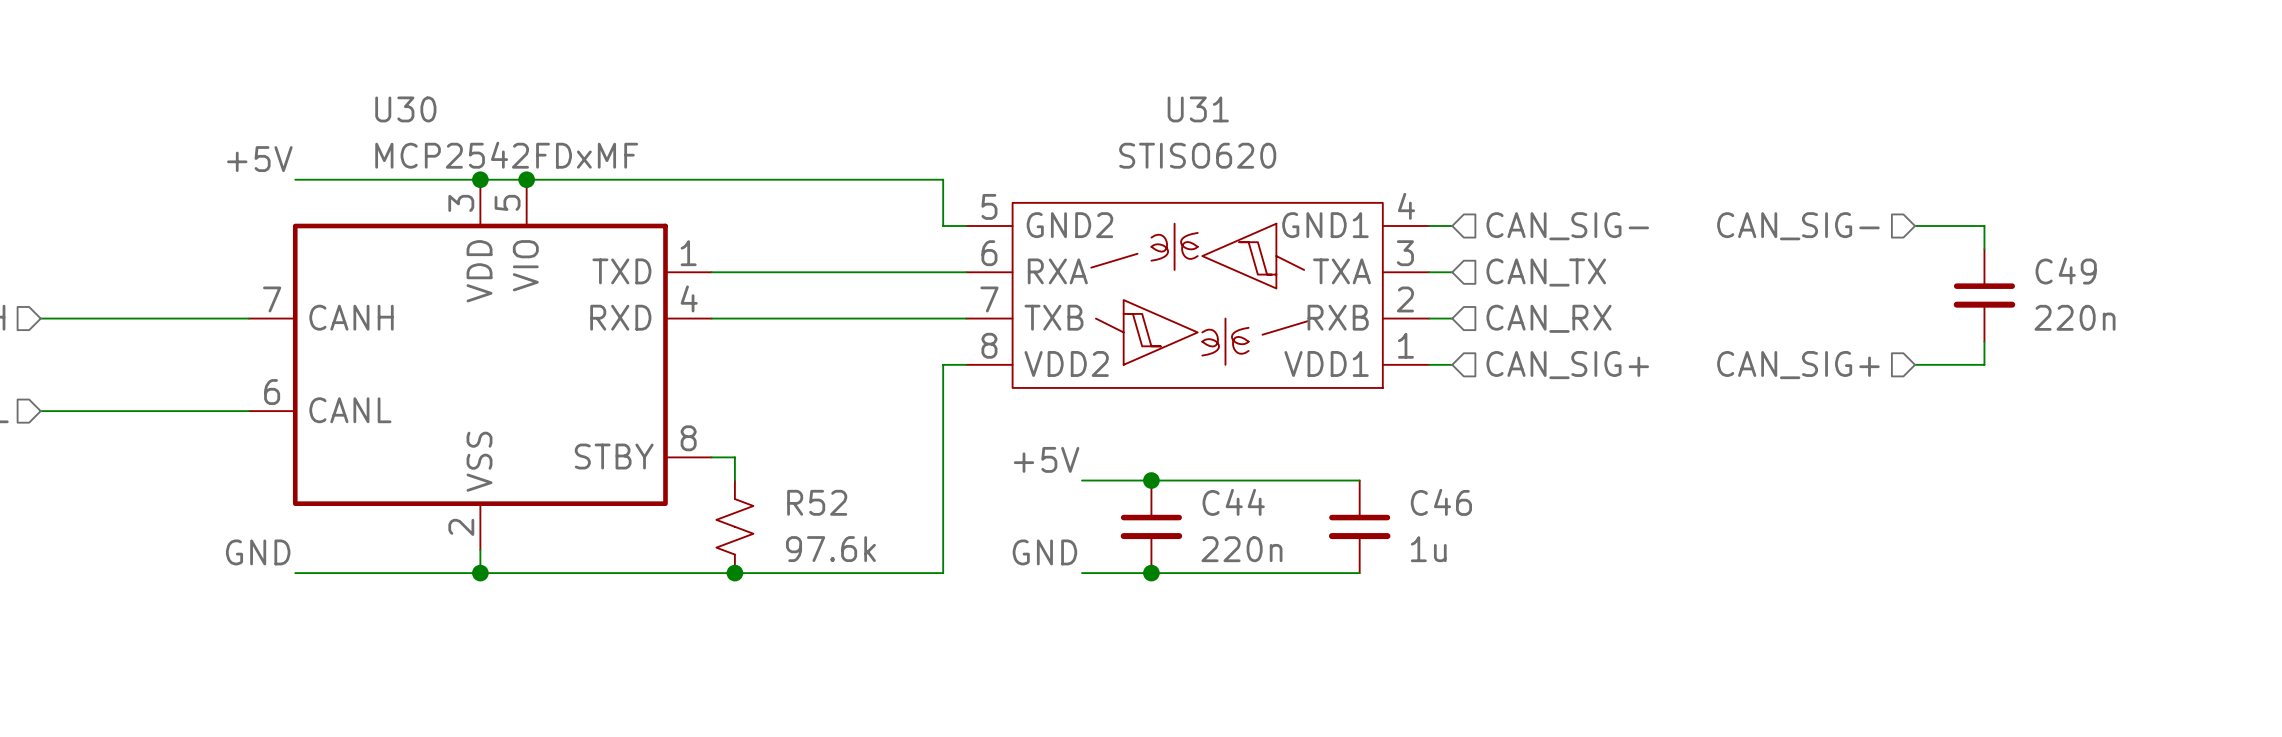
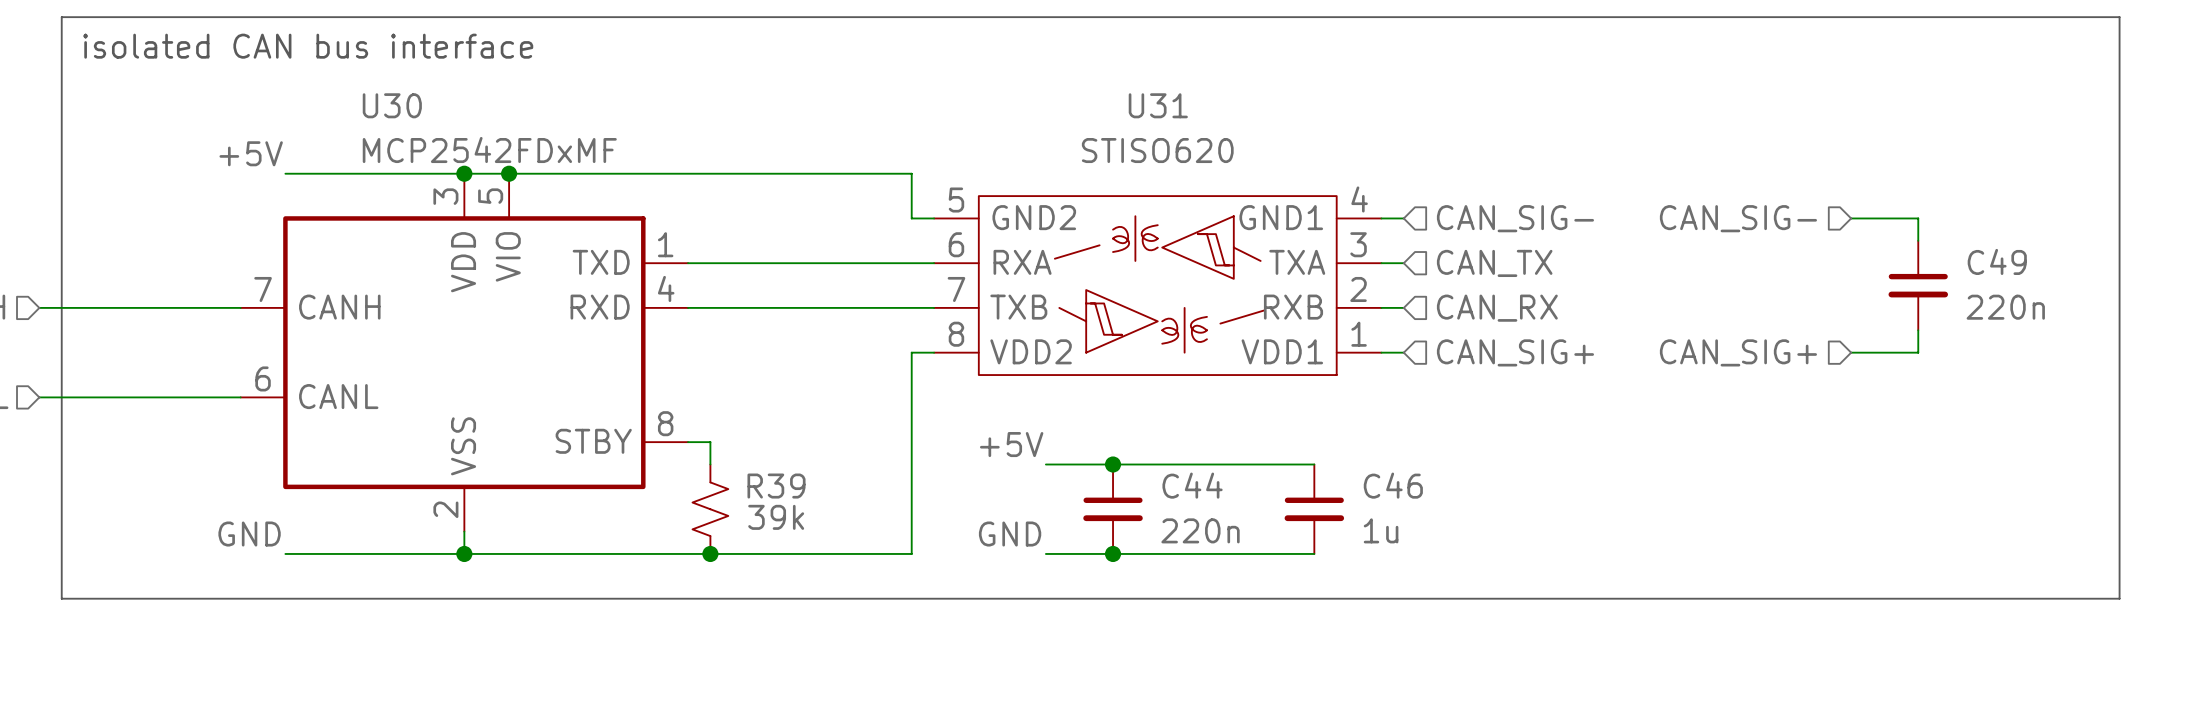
line: none -> (61, 17) (61, 598) (2119, 598) (2119, 17) (61, 17)
text: none -> isolated CAN bus interface (308, 46)
R52 name: R52 (817, 502) -> R39 (776, 486)
R52 value: 97.6k (830, 549) -> 39k (776, 517)

